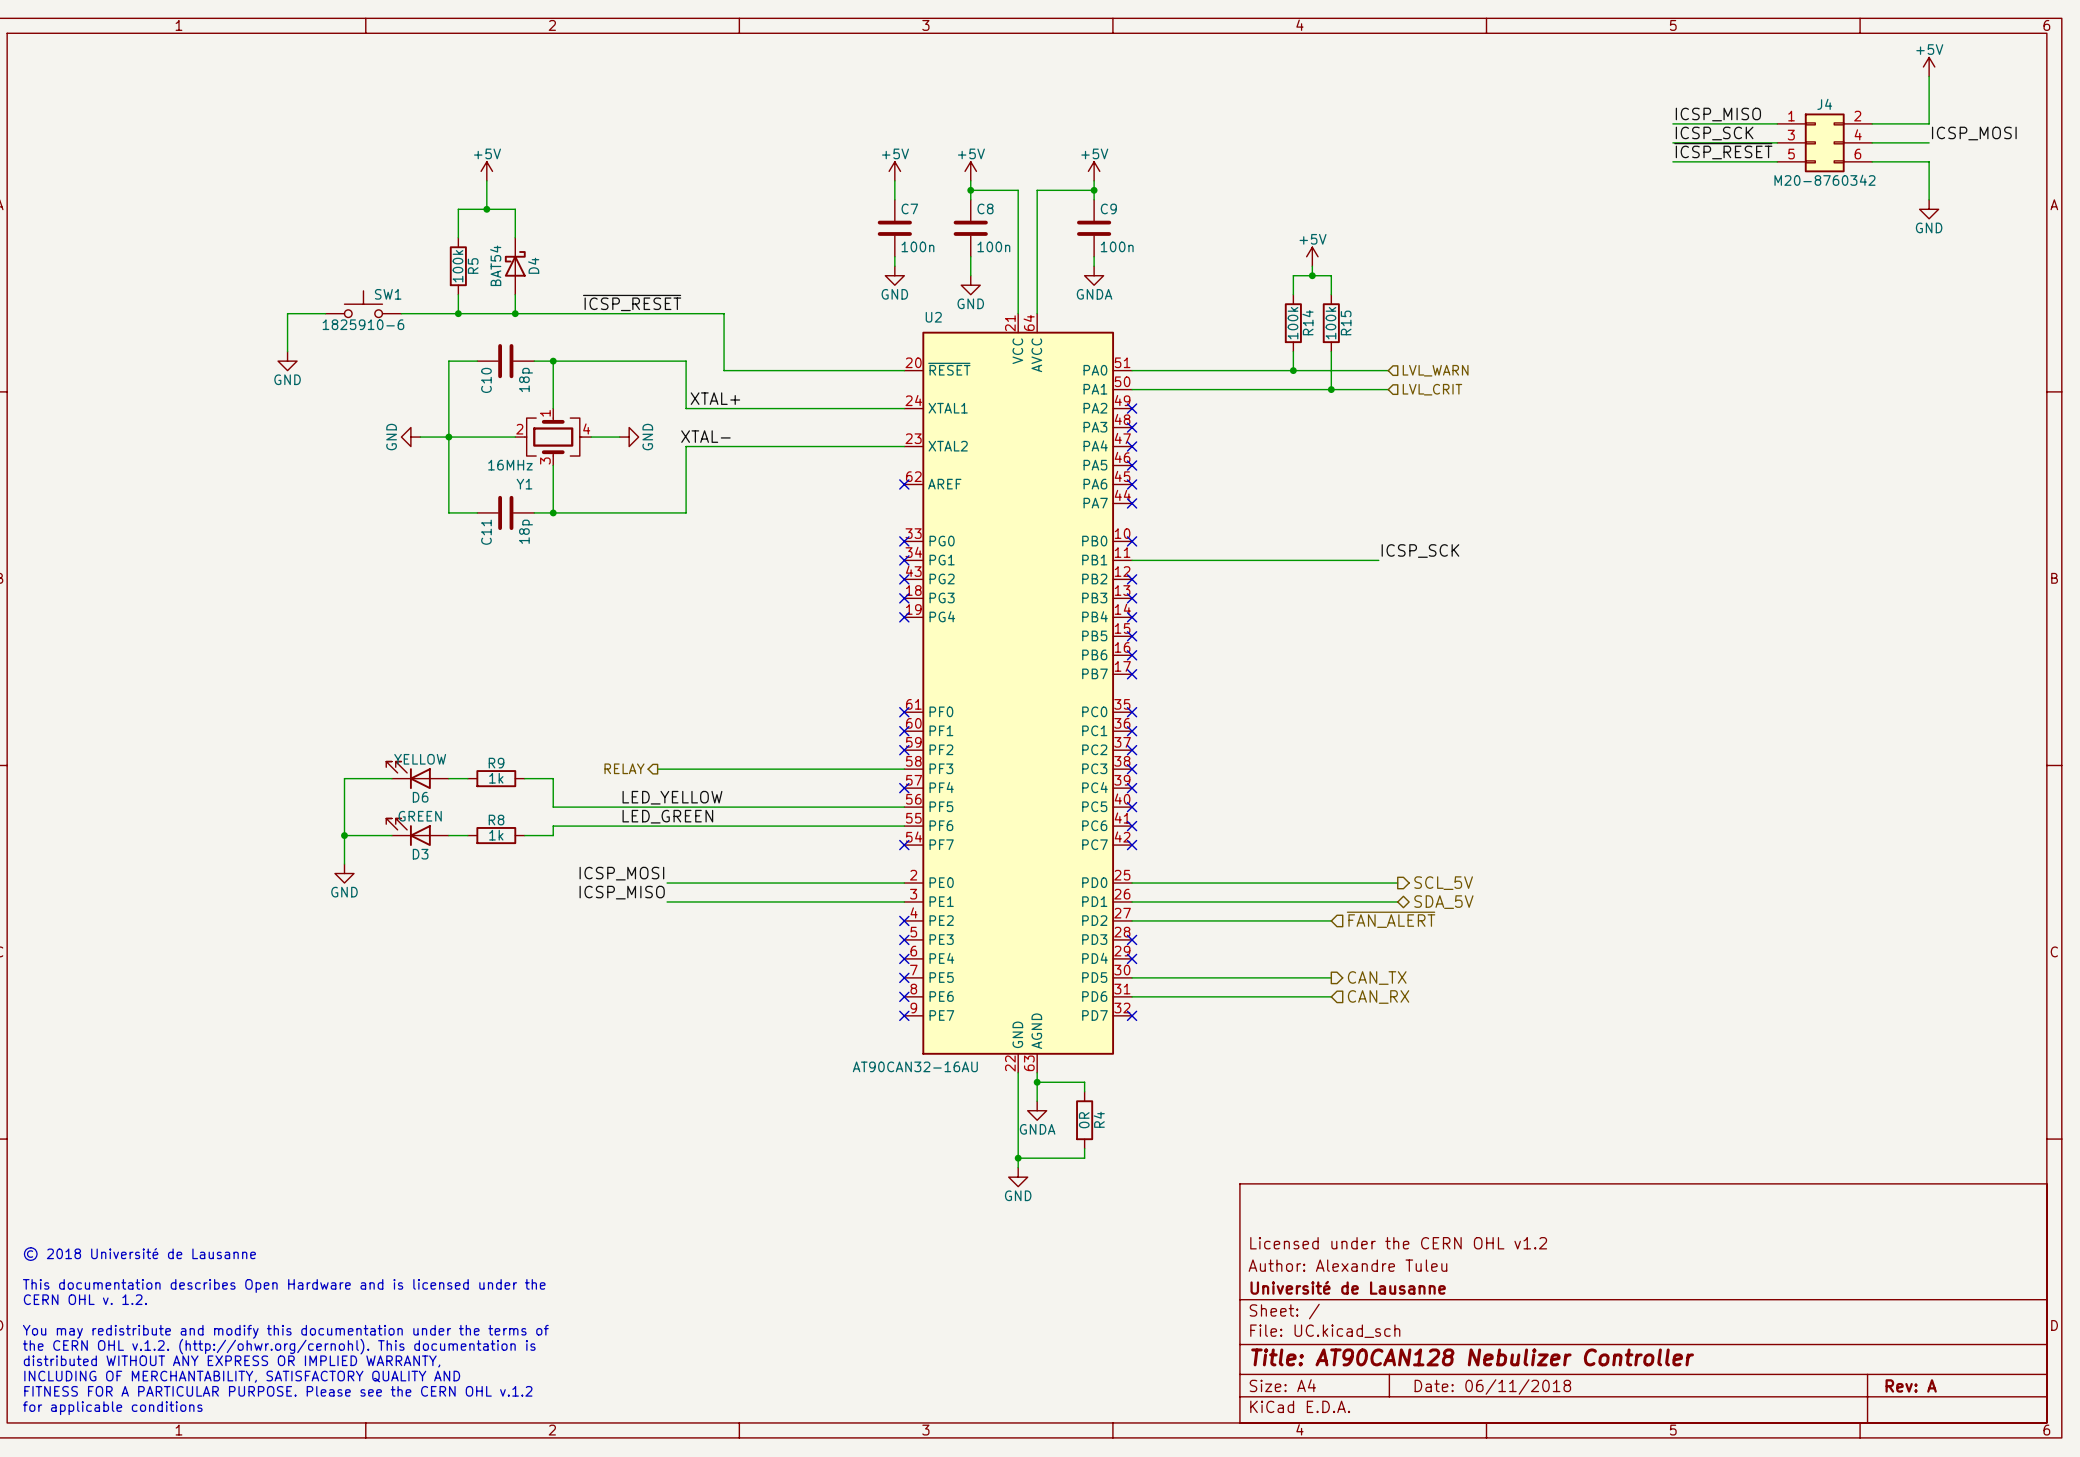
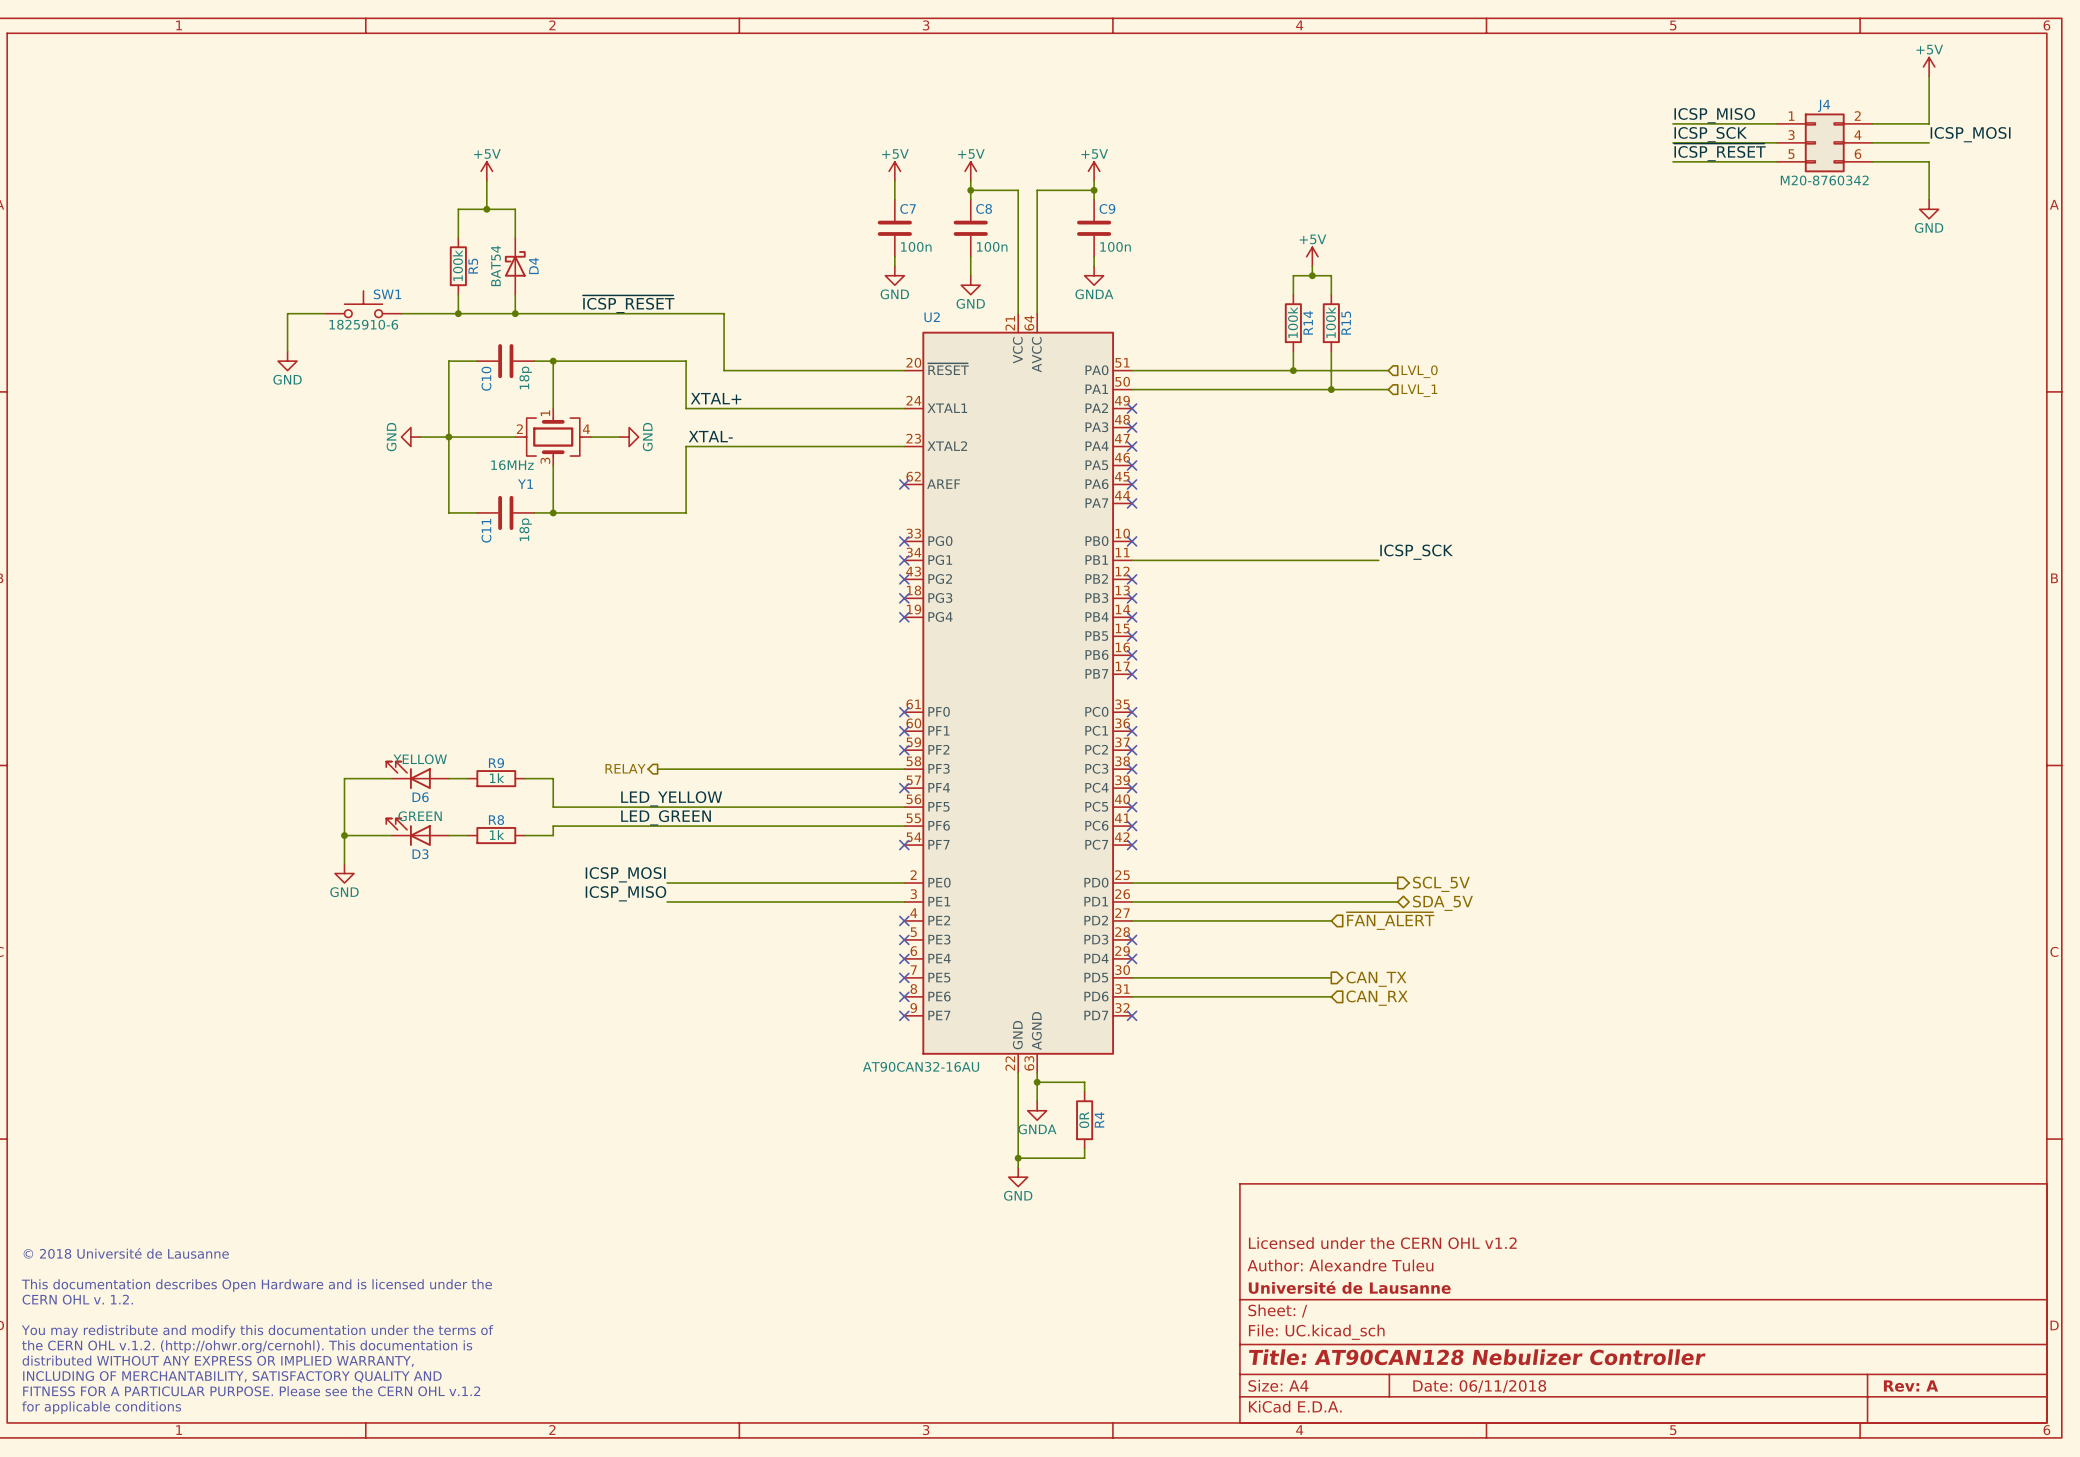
hierarchical label: LVL_WARN (1435, 370) -> LVL_0 (1419, 371)
hierarchical label: LVL_CRIT (1432, 389) -> LVL_1 (1419, 390)

